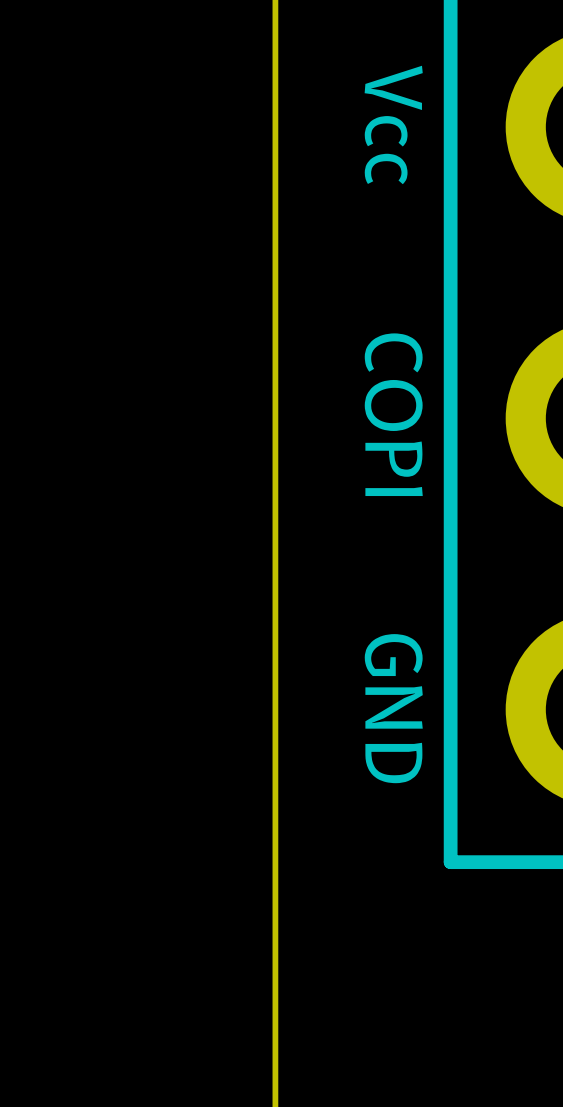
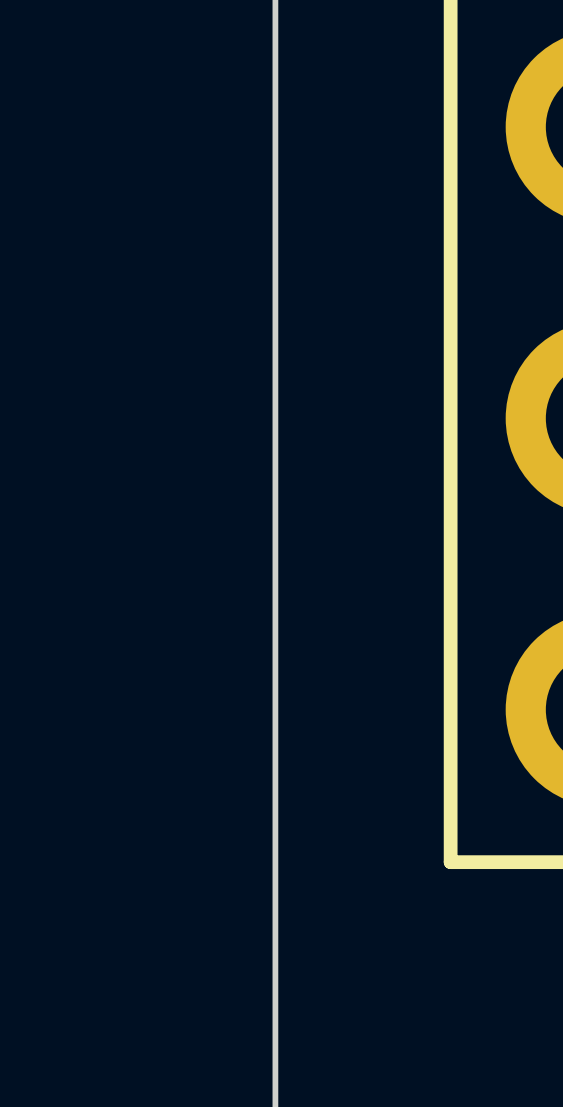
text: Vcc (393, 124) -> none
text: COPI (393, 414) -> none
text: GND (393, 708) -> none

